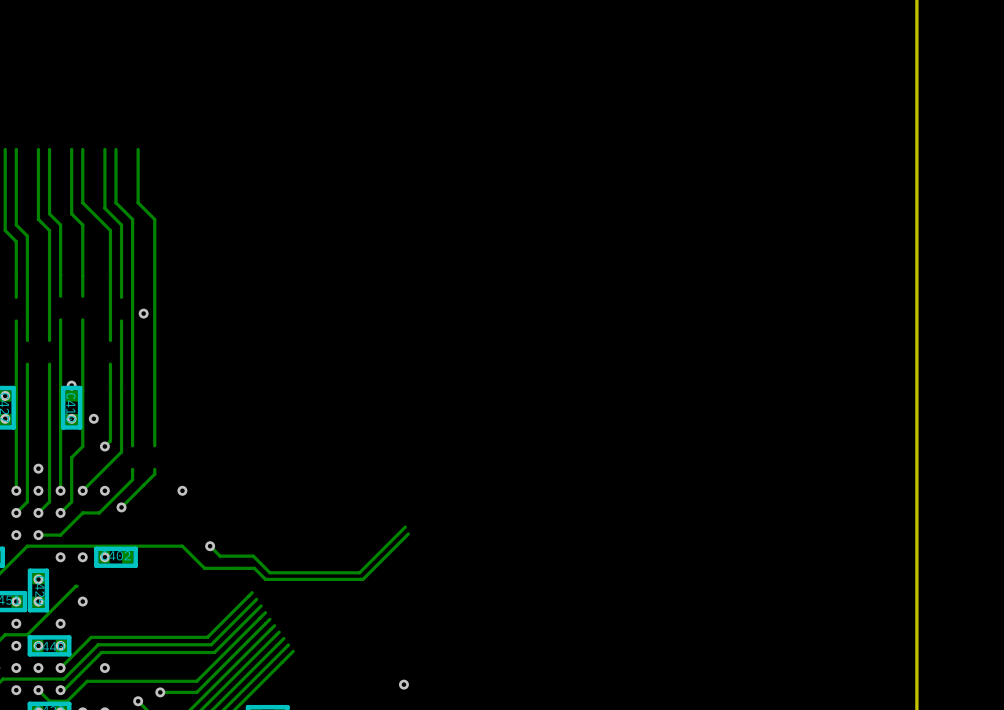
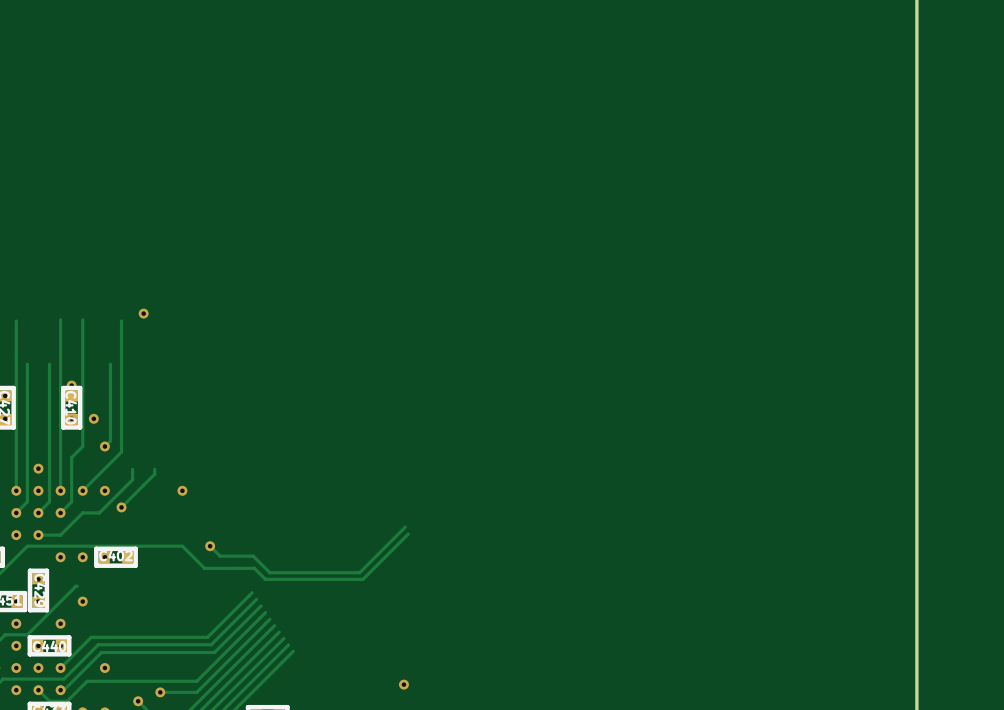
track: (5, 149) (5, 230) (16, 241) (16, 297) -> none
track: (16, 149) (16, 224) (27, 236) (27, 340) -> none
track: (38, 149) (38, 219) (49, 230) (49, 340) -> none
track: (49, 149) (49, 213) (60, 224) (60, 296) -> none
track: (71, 149) (71, 213) (82, 224) (82, 296) -> none
track: (82, 149) (82, 202) (110, 230) (110, 340) -> none
track: (104, 149) (104, 208) (121, 224) (121, 297) -> none
track: (115, 149) (115, 202) (132, 219) (132, 445) -> none
track: (138, 149) (138, 202) (154, 219) (154, 445) -> none

